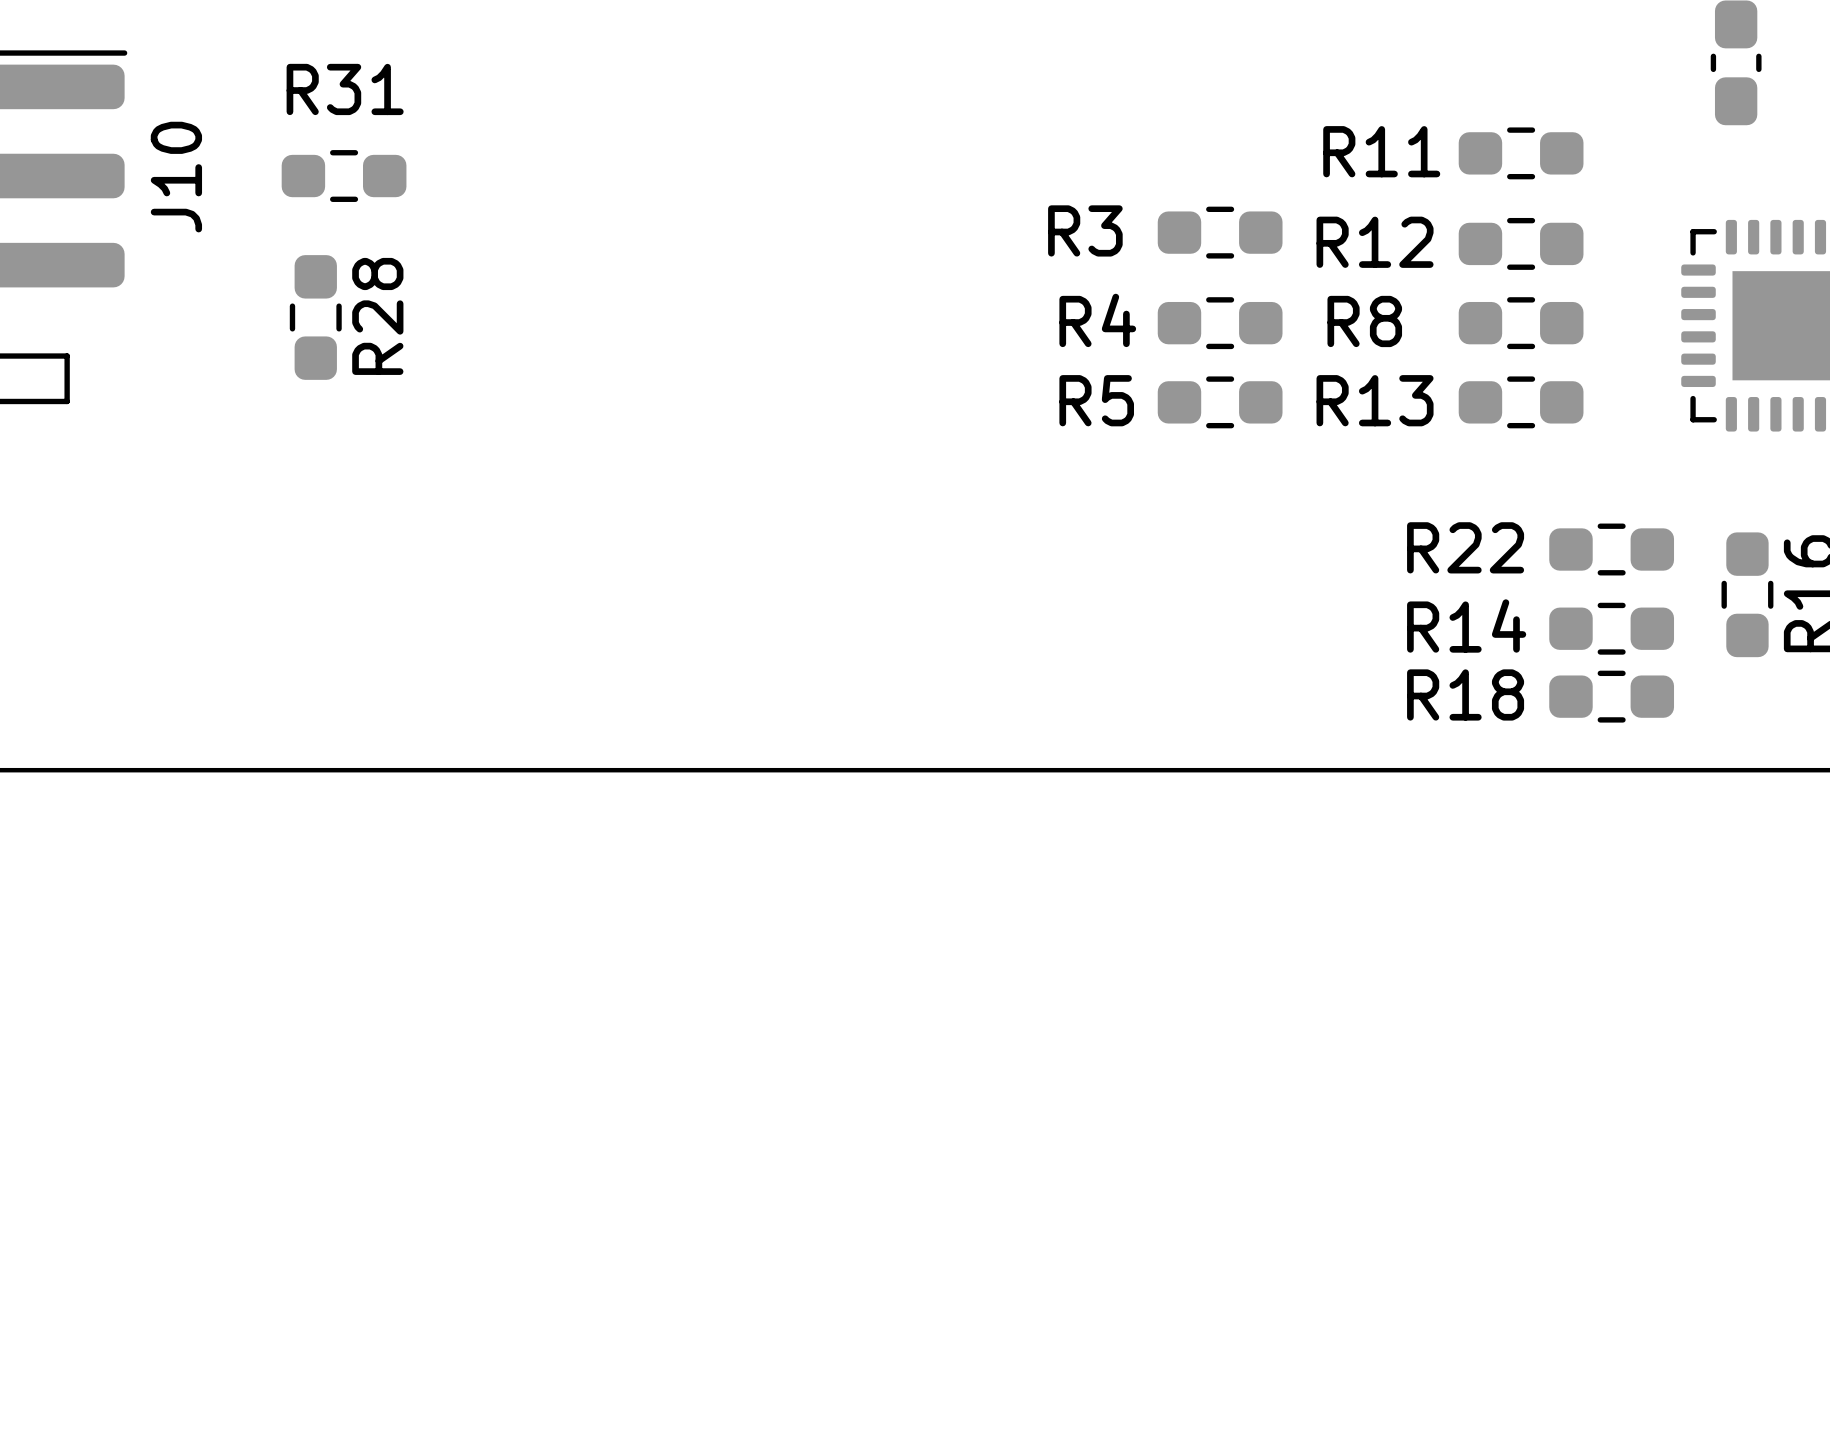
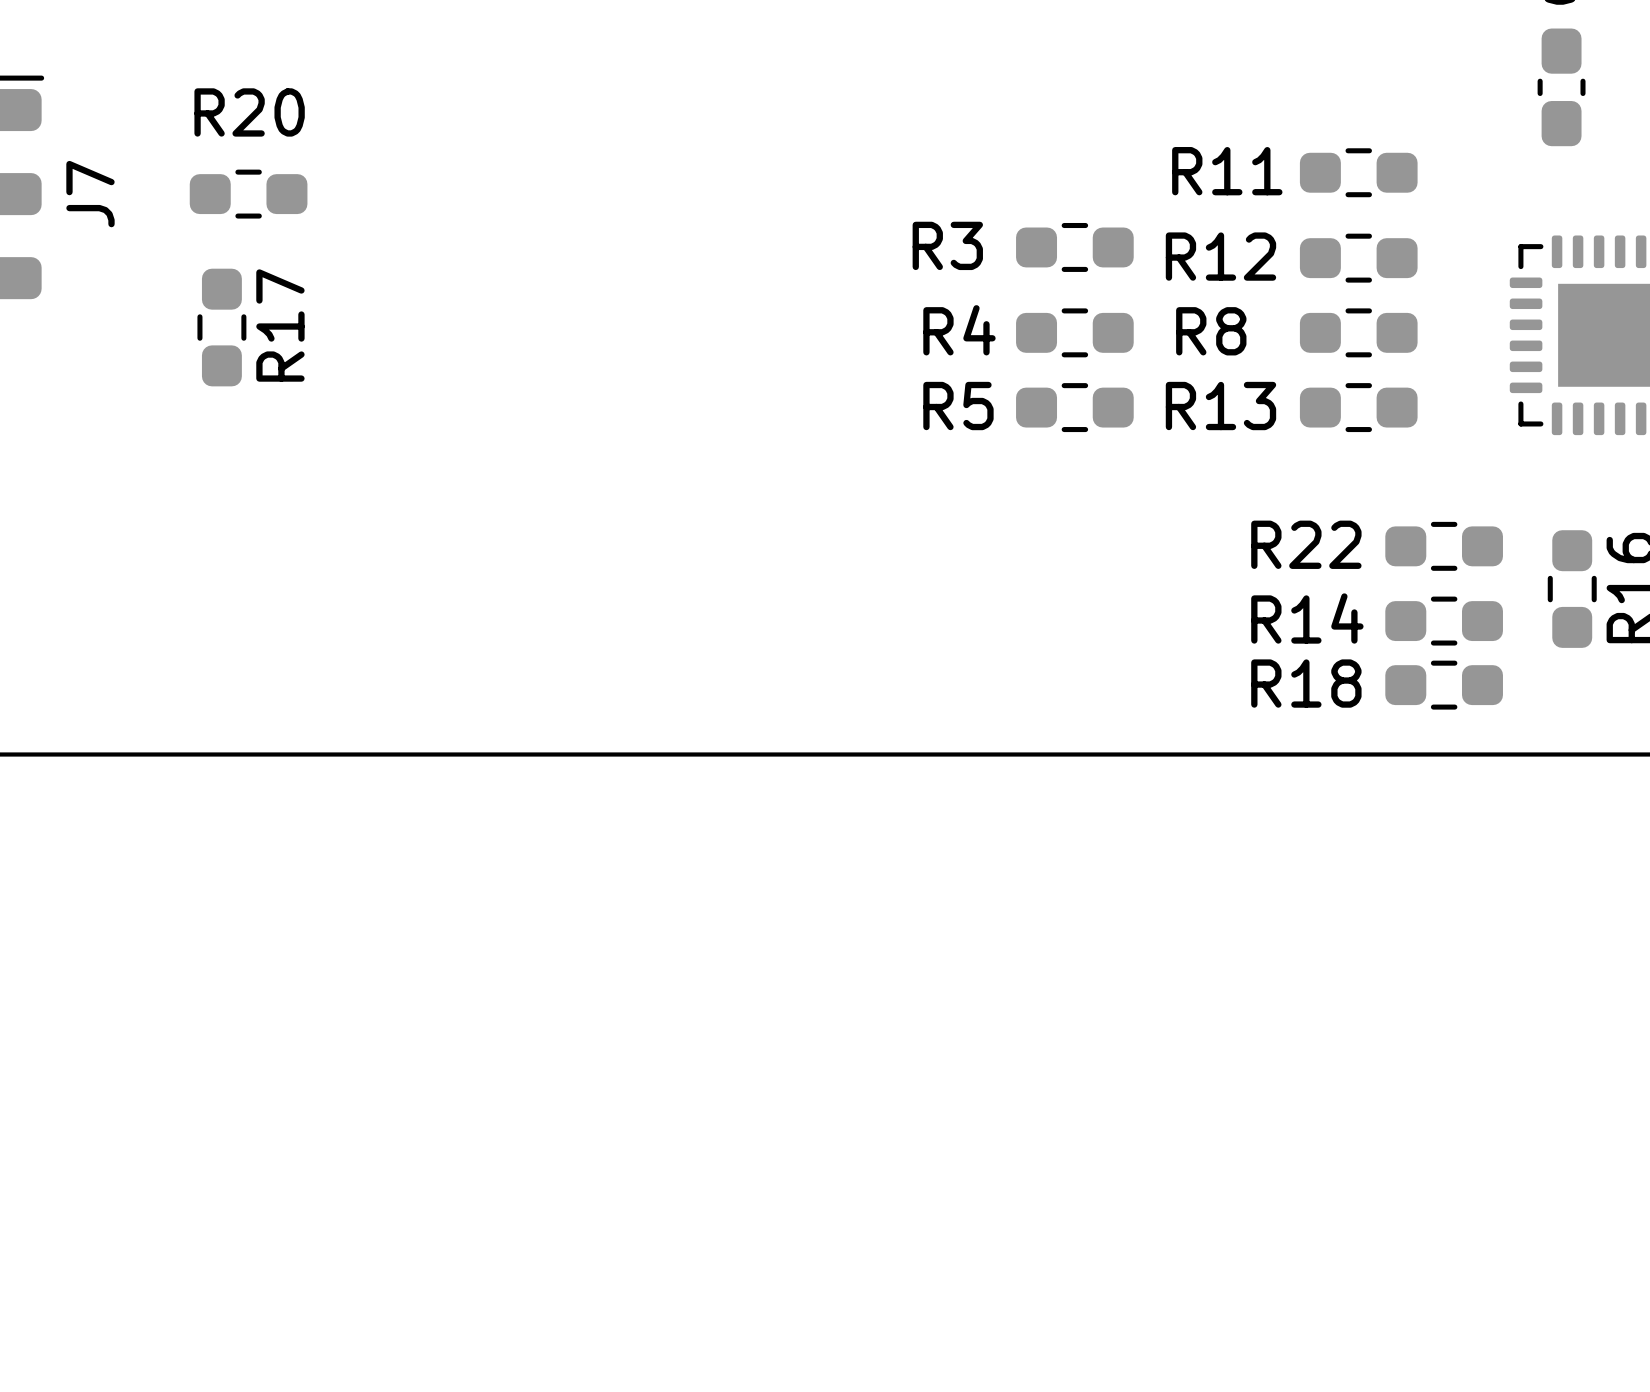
R31 name: R31 (345, 89) -> R20 (249, 112)
J10 name: J10 (176, 177) -> J7 (90, 194)
R28 name: R28 (377, 316) -> R17 (280, 325)

